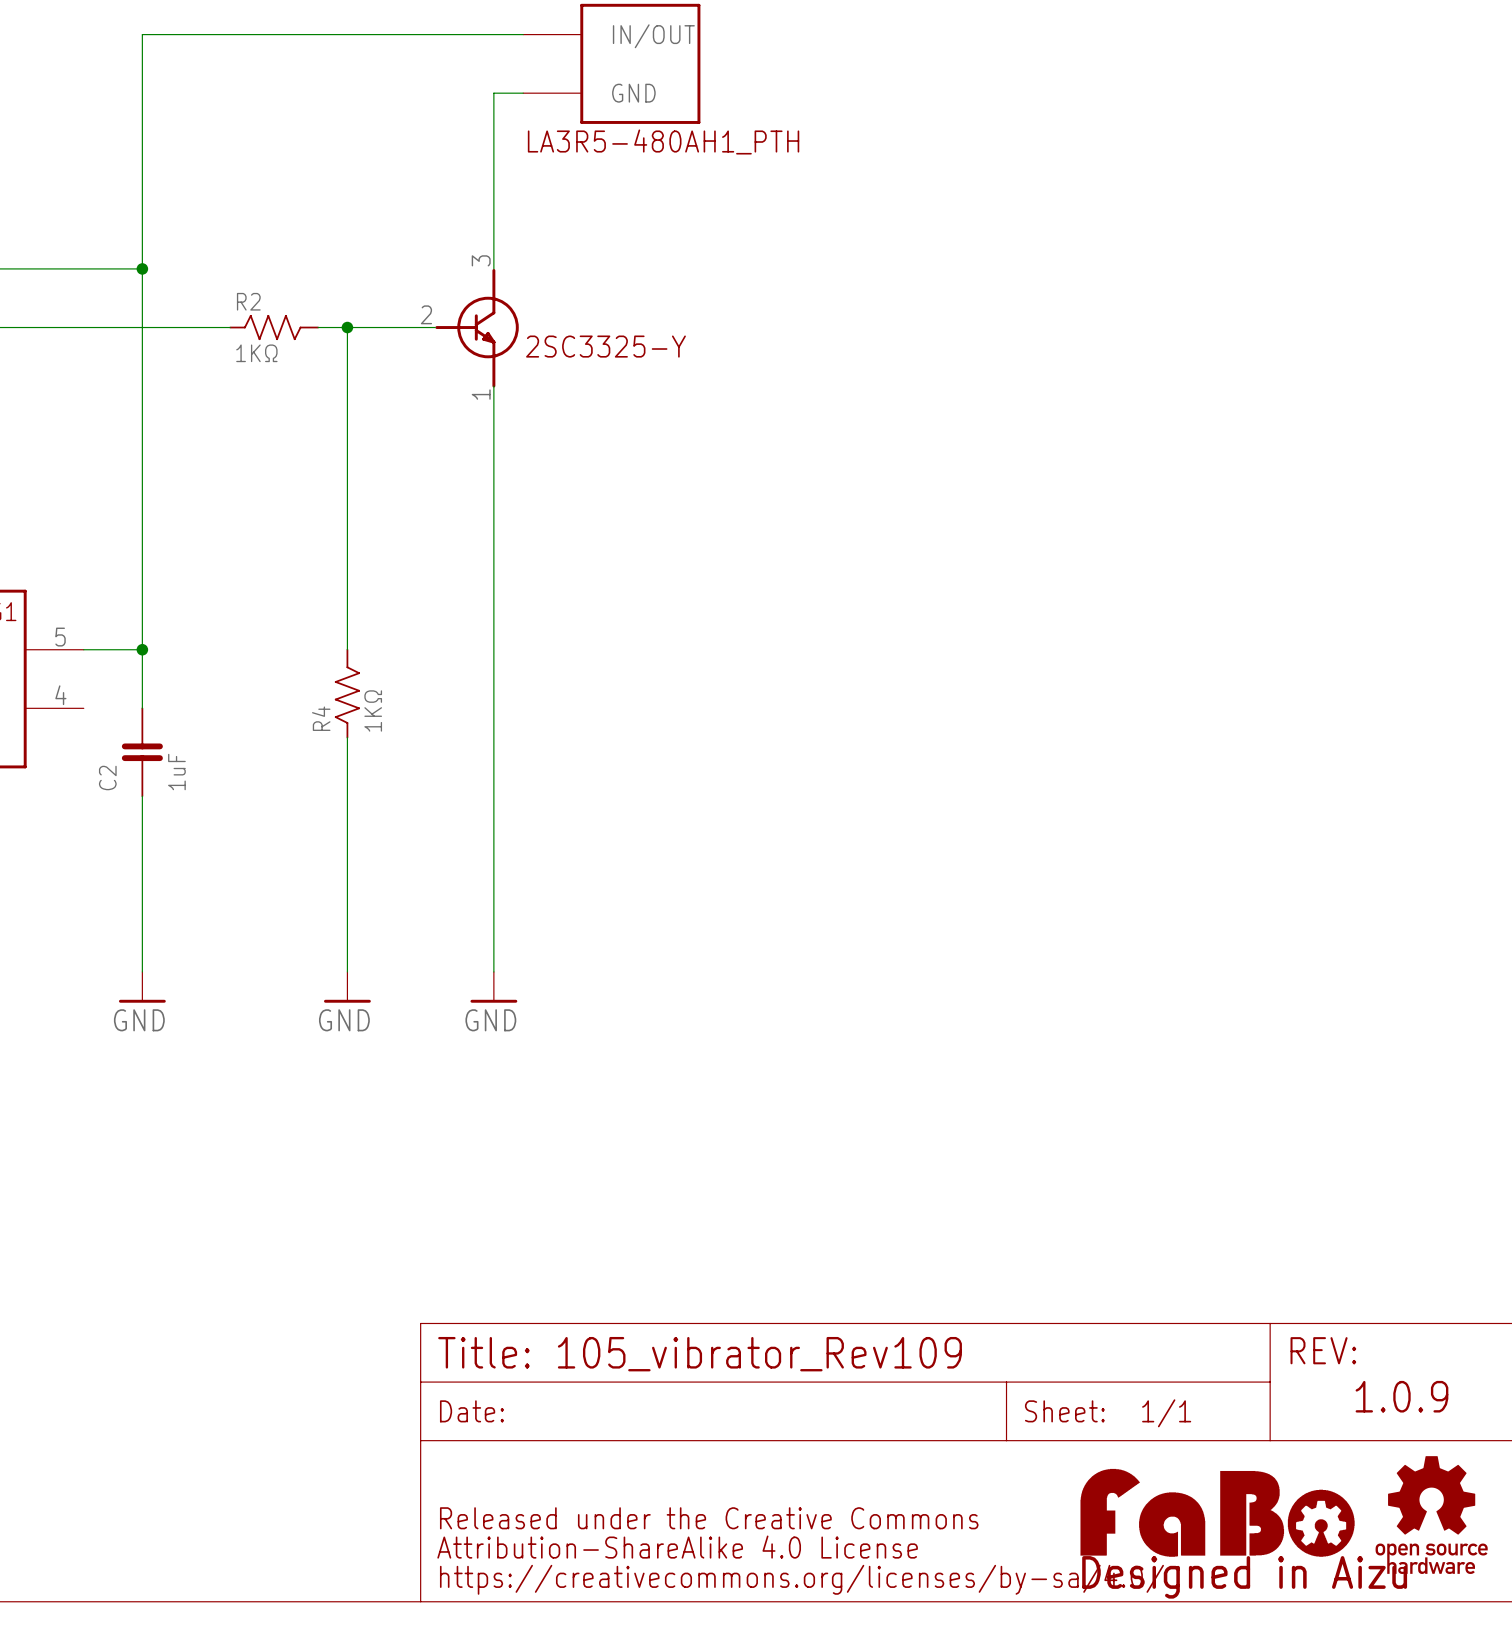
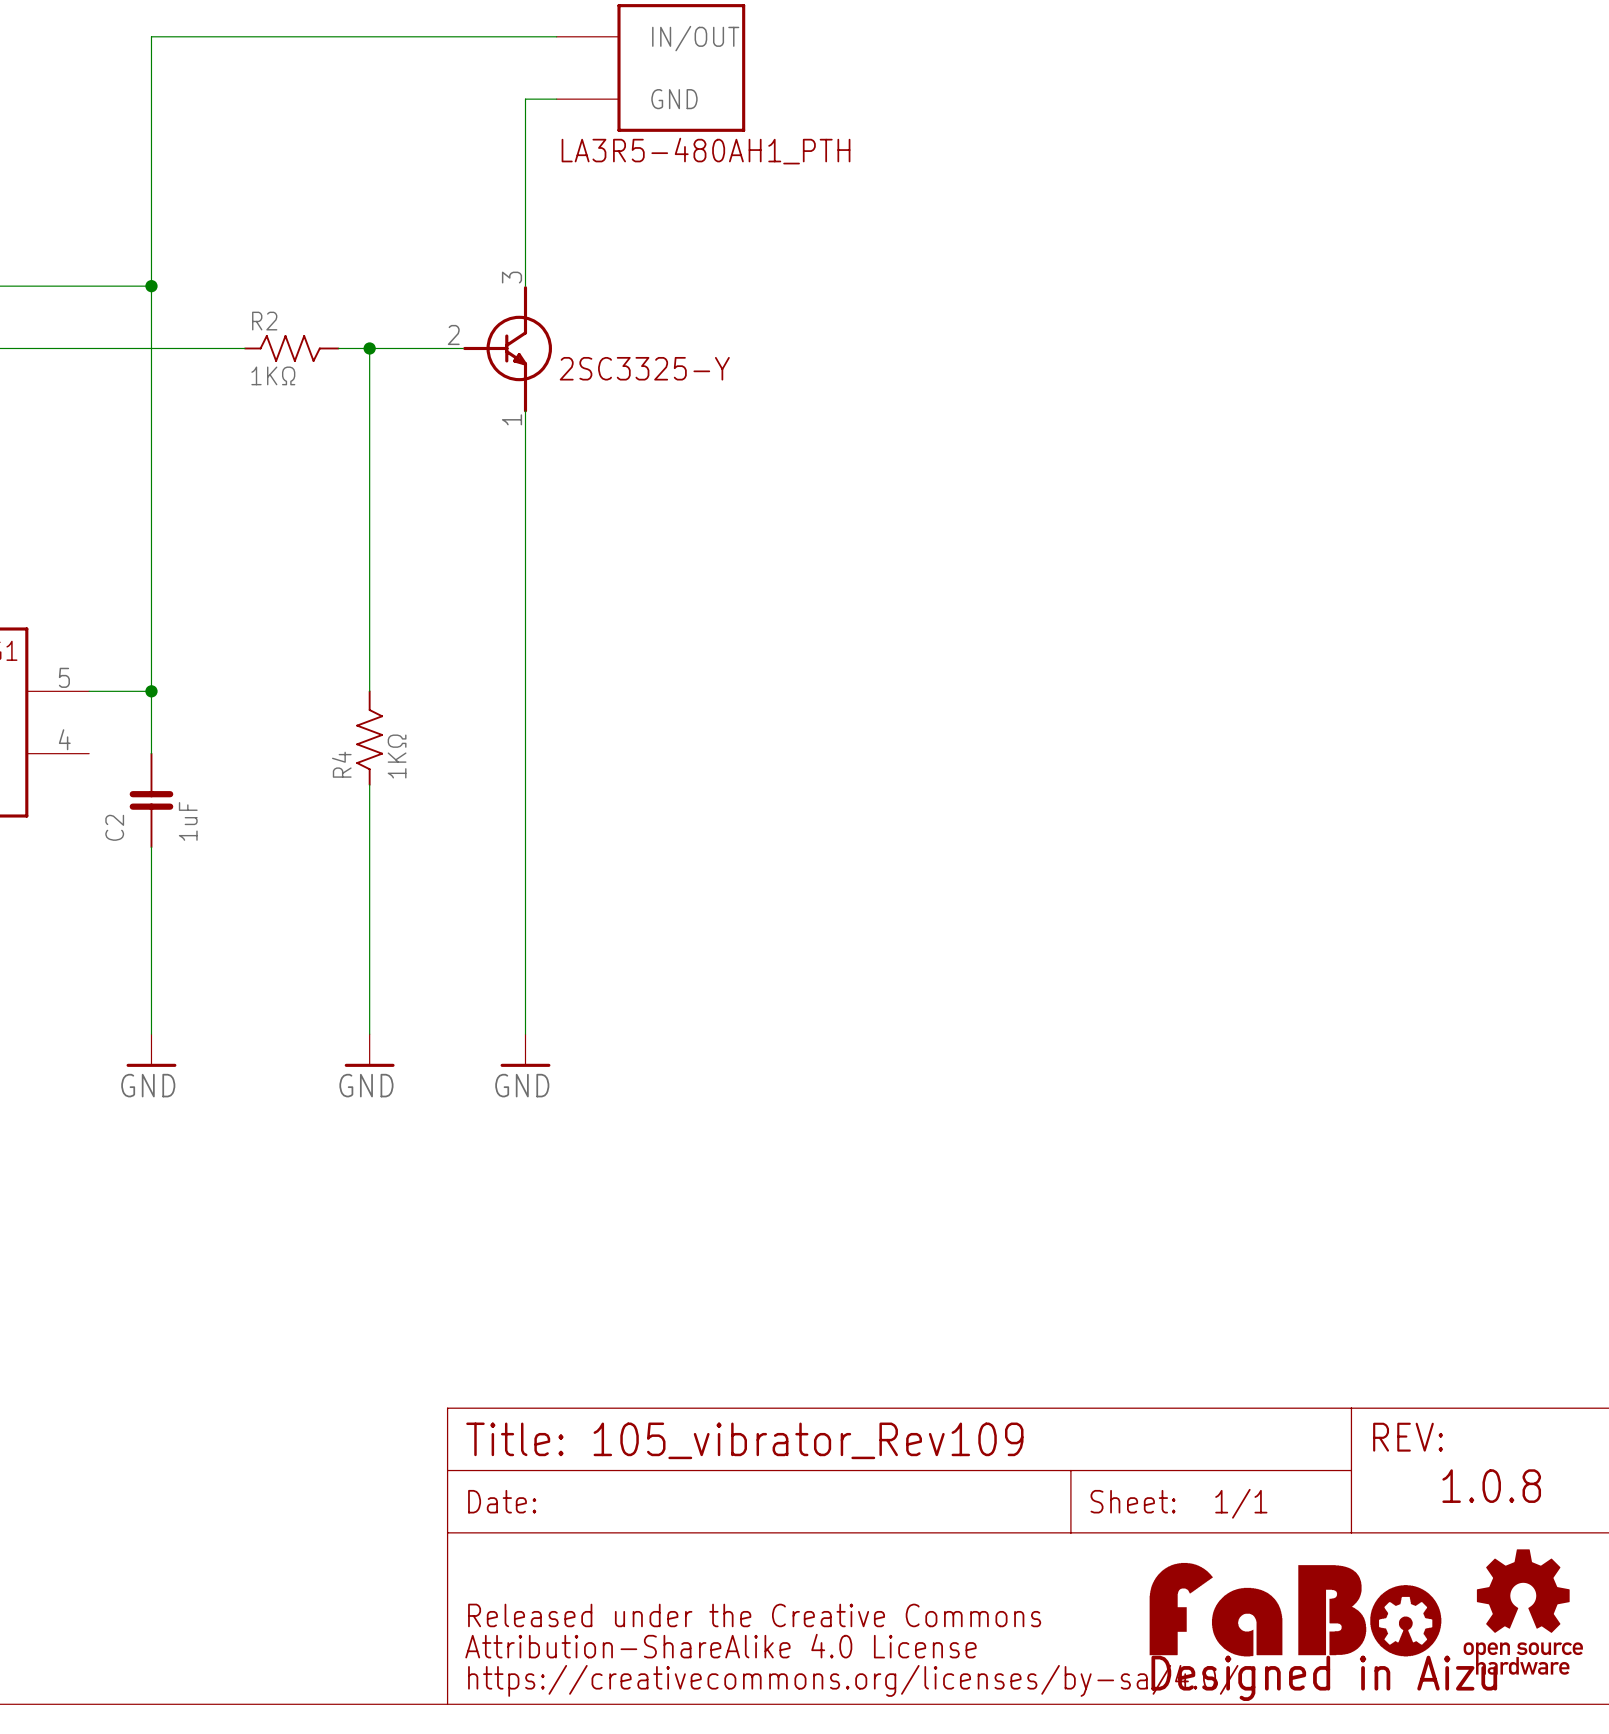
text: 1.0.9 (1401, 1396) -> 1.0.8 (1491, 1486)

